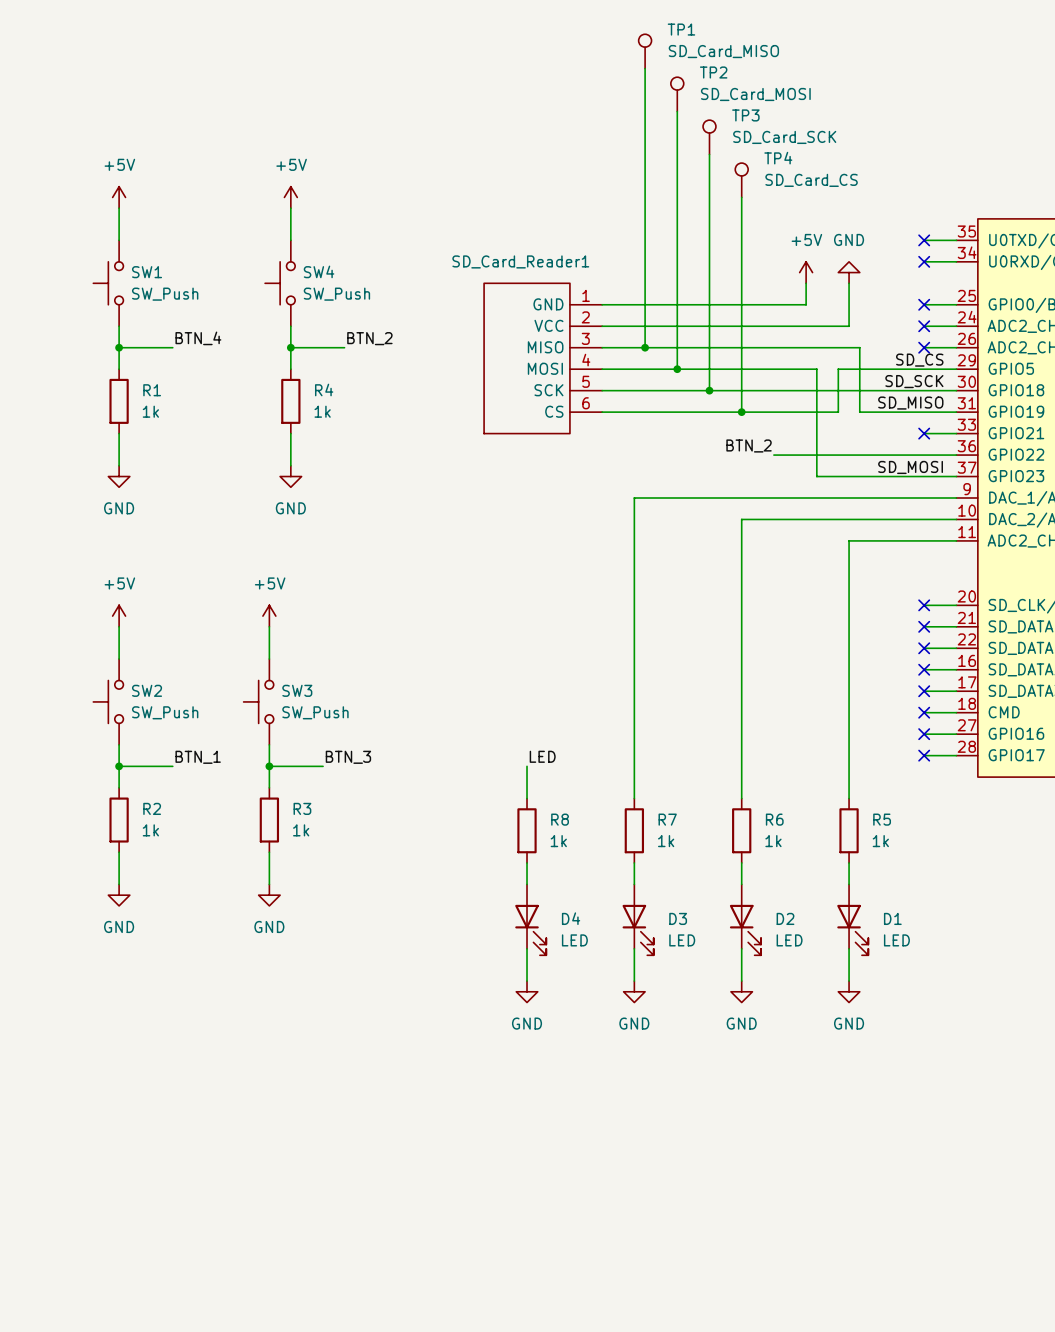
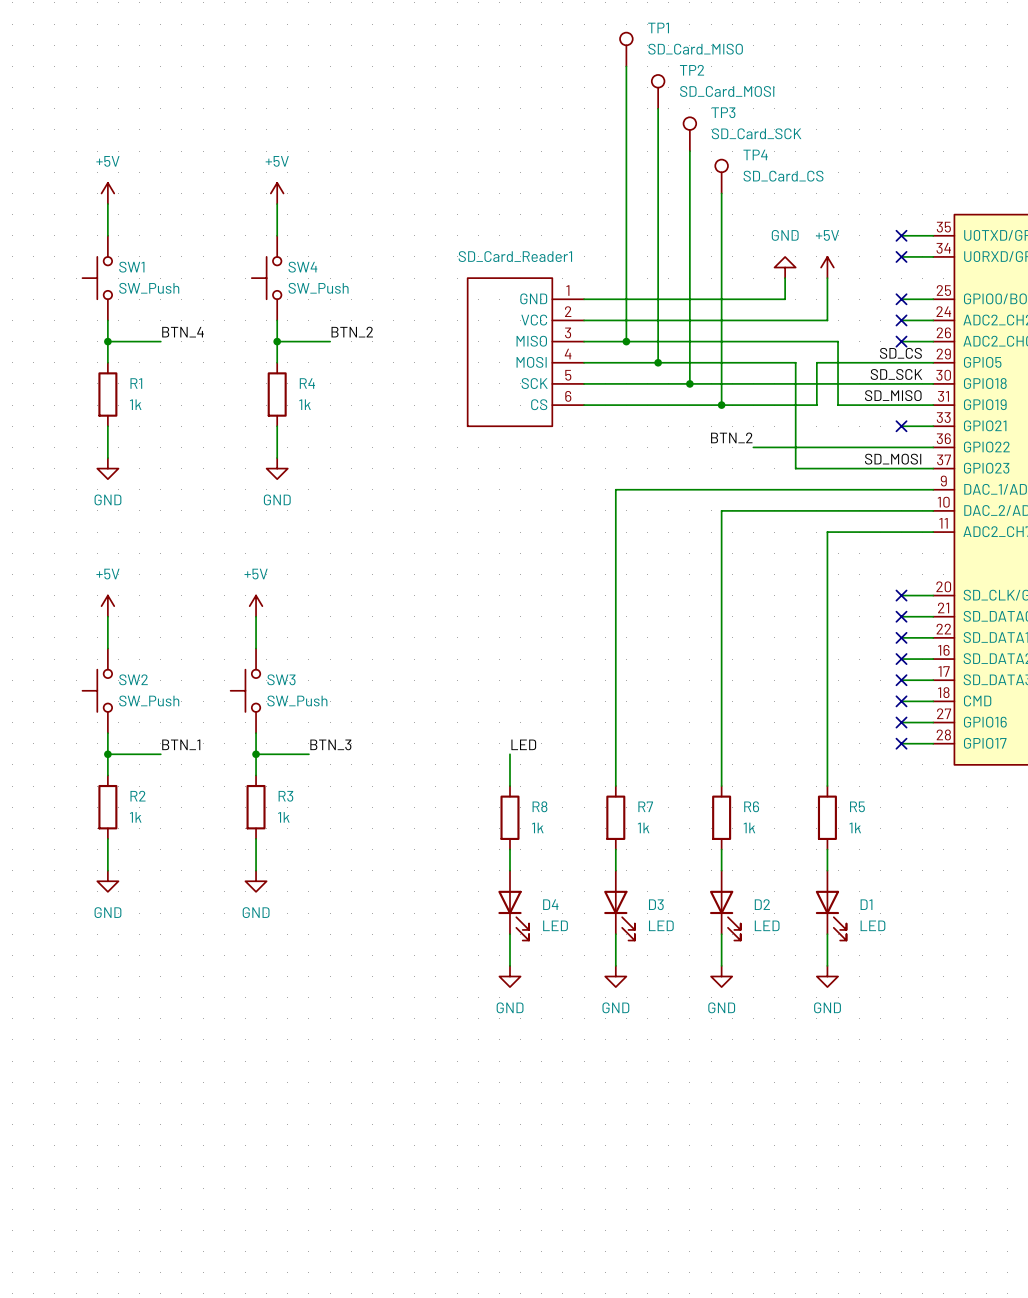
power symbol: +5V (806, 272) -> GND (785, 267)
power symbol: GND (849, 272) -> +5V (827, 267)

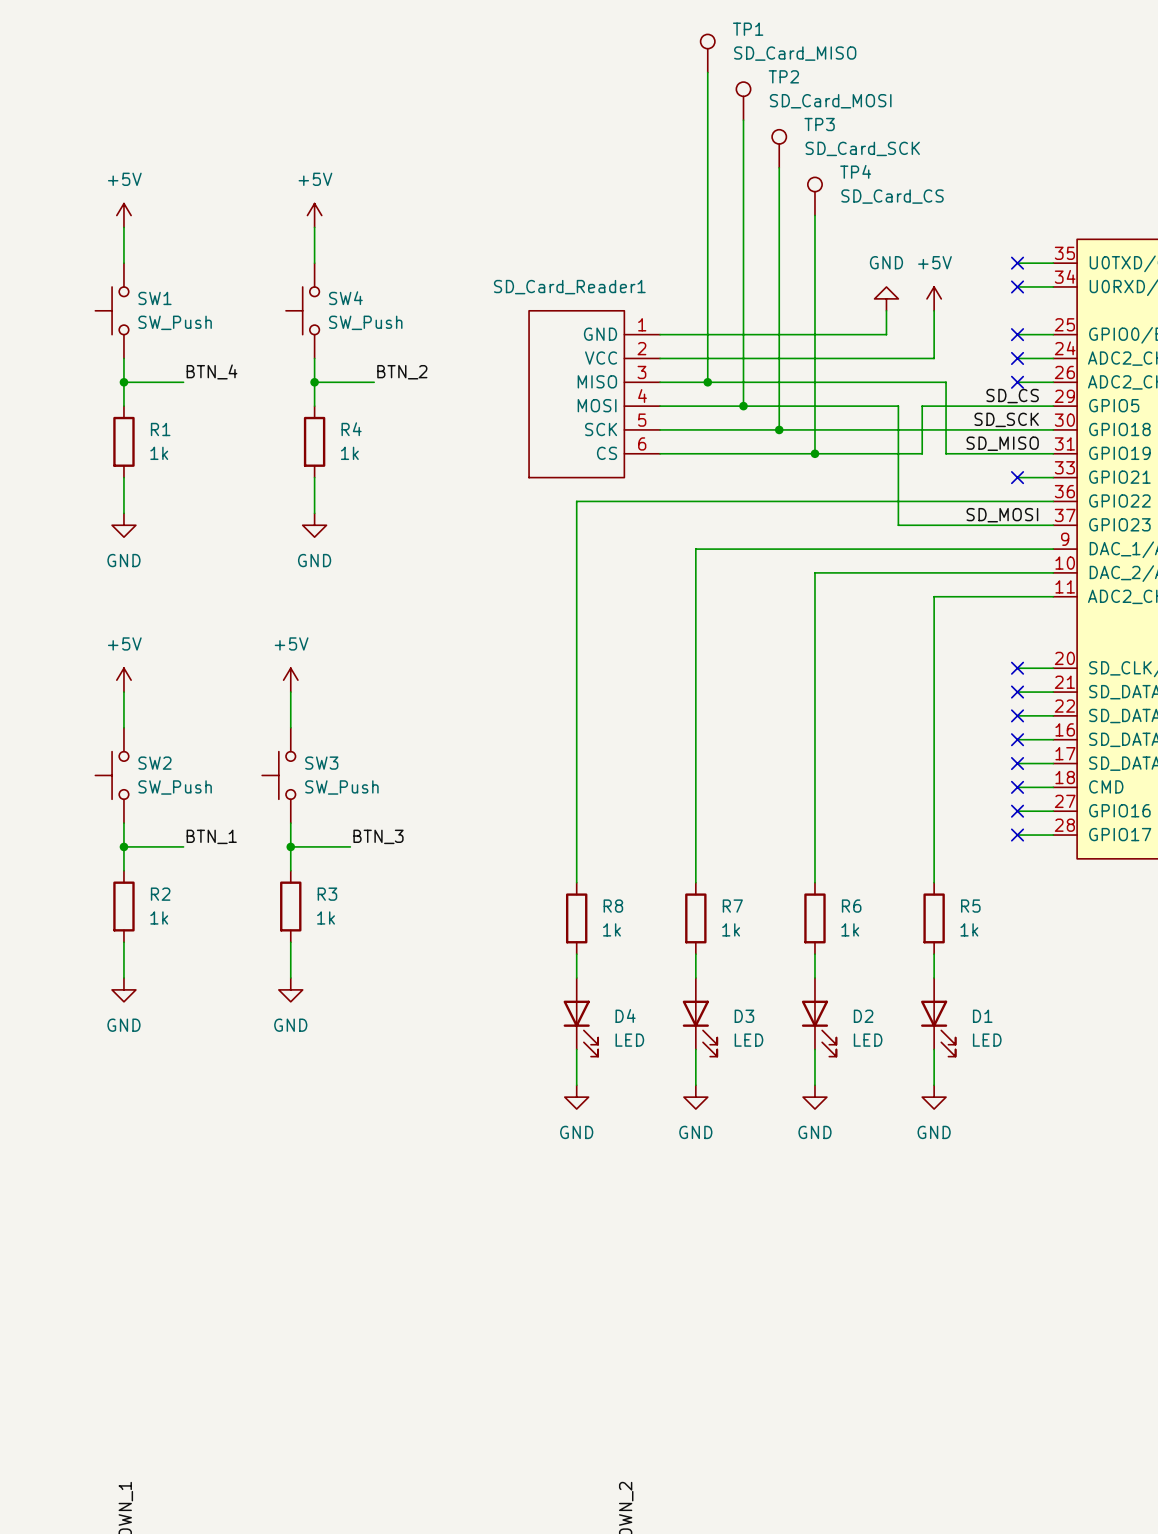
label: BTN_2 (731, 437) -> none
wire: none -> (850, 501) (576, 501) (576, 846)
label: LED (523, 744) -> none

